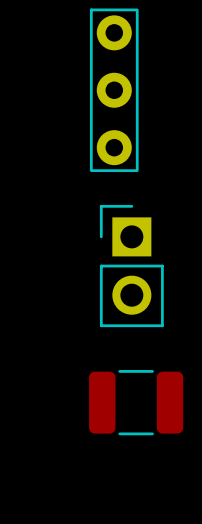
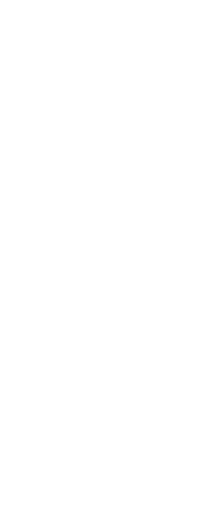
part: (114, 90) -> none
part: (131, 266) -> none
part: (136, 402) -> none

